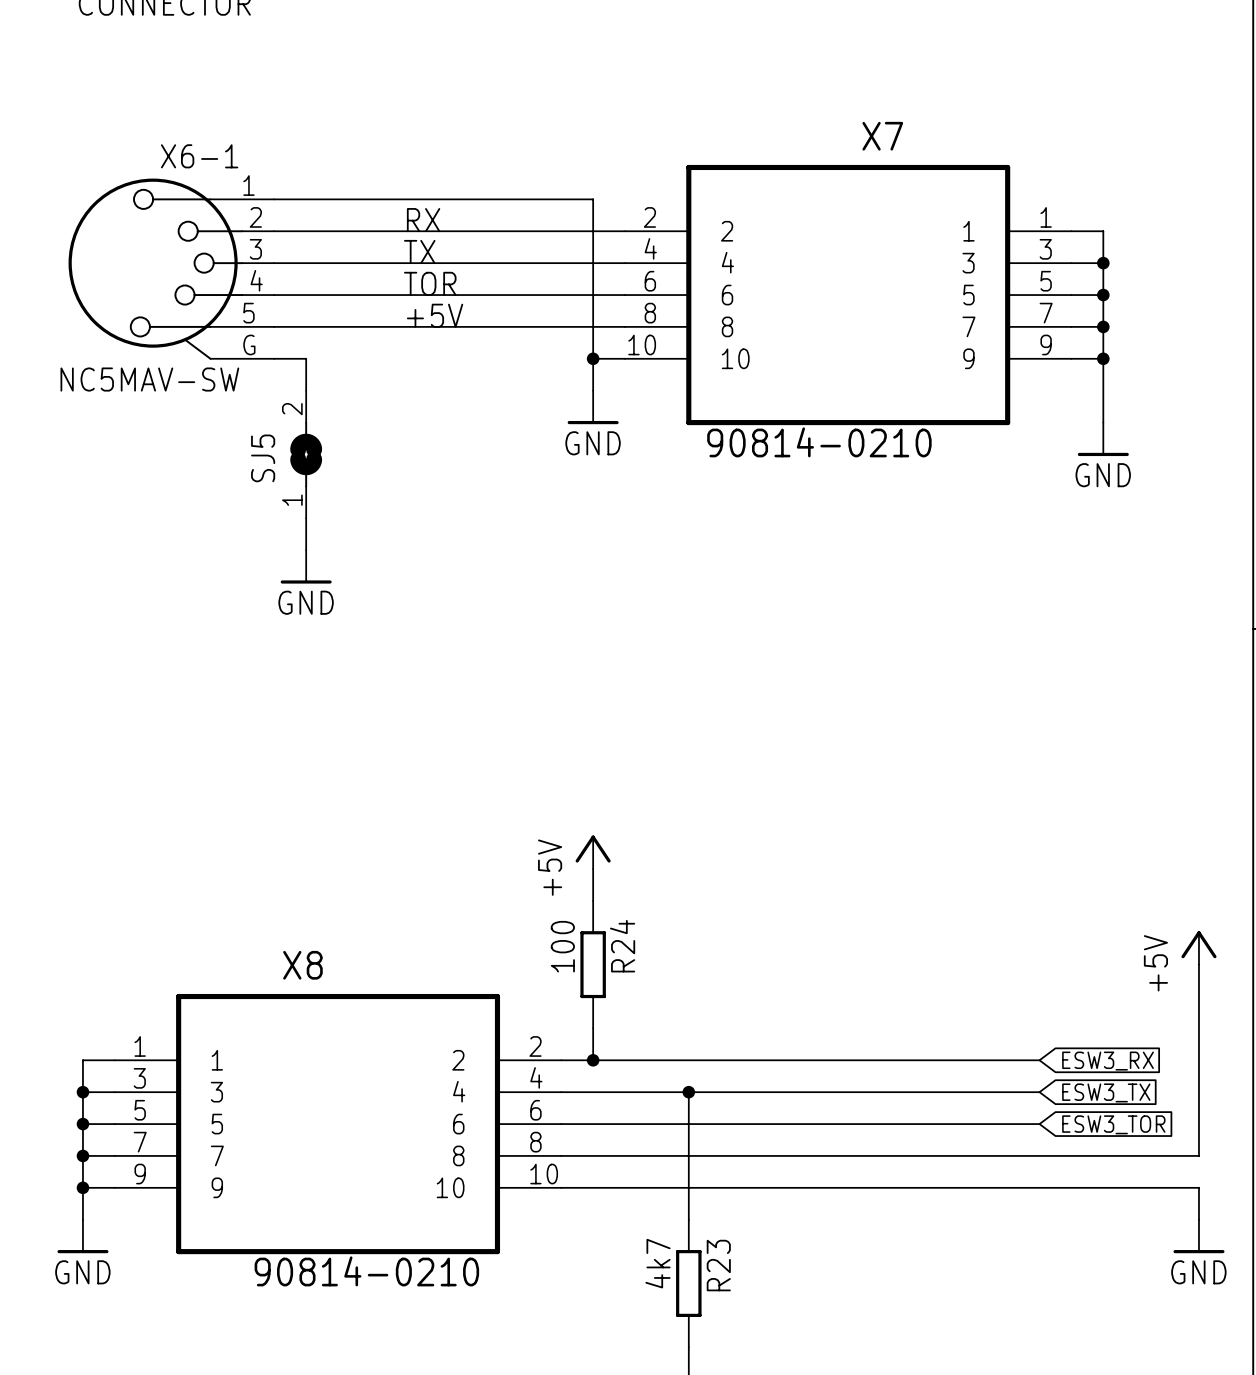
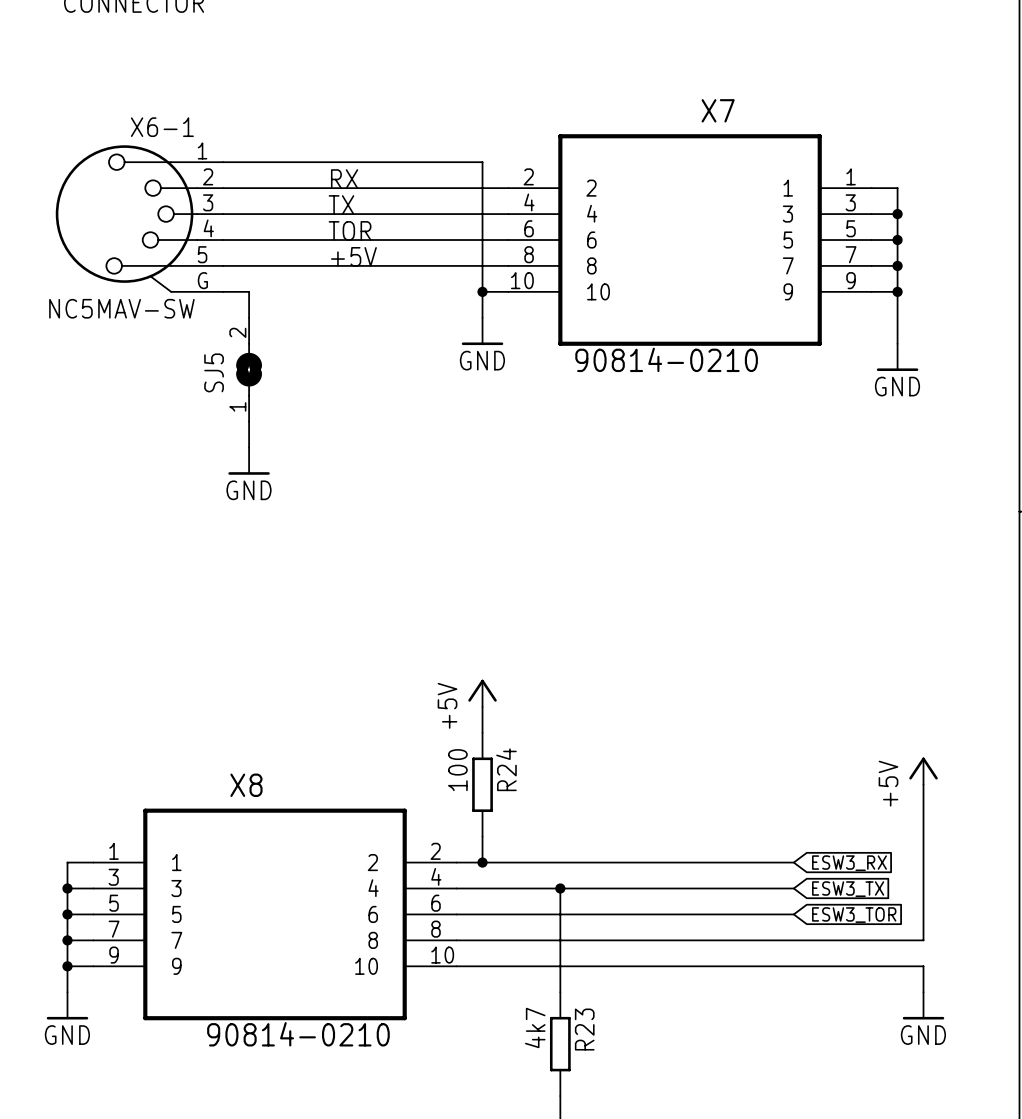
power symbol position: +5V (1198, 947) -> +5V (923, 771)
wire: (1198, 964) (1198, 1155) (1135, 1155) -> (923, 784) (923, 940)
wire: (975, 1060) (1039, 1060) -> none
global label position: ESW3_RX (1108, 1061) -> ESW3_RX (849, 863)
wire: (975, 1092) (1039, 1092) -> none
global label position: ESW3_TX (1106, 1092) -> ESW3_TX (848, 889)
wire: (975, 1124) (1039, 1124) -> none
global label position: ESW3_TOR (1113, 1124) -> ESW3_TOR (854, 915)
wire: (1135, 1187) (1198, 1187) (1198, 1219) -> (923, 966) (923, 992)
power symbol position: GND (1198, 1236) -> GND (923, 1005)

